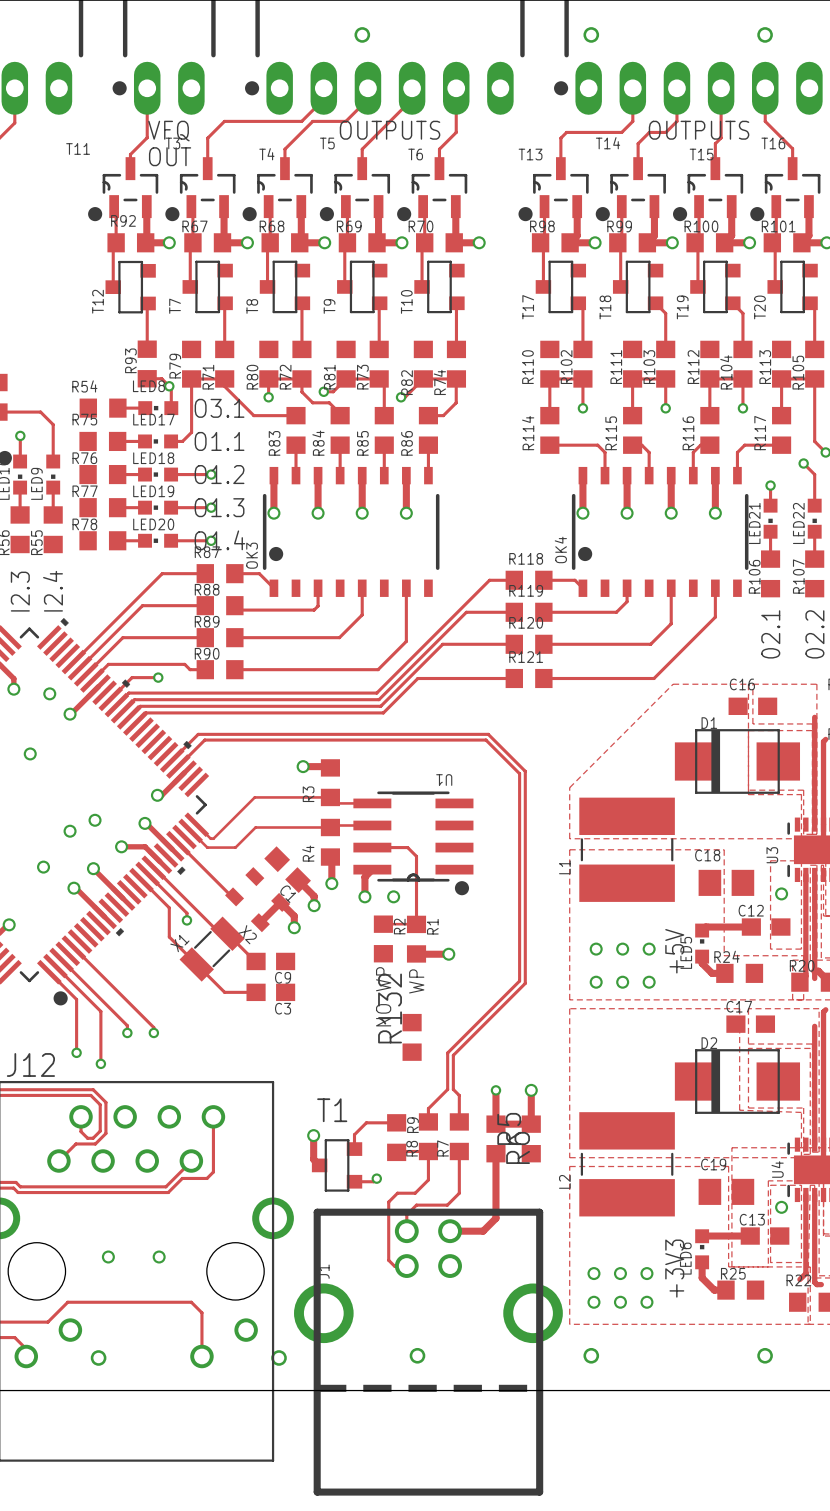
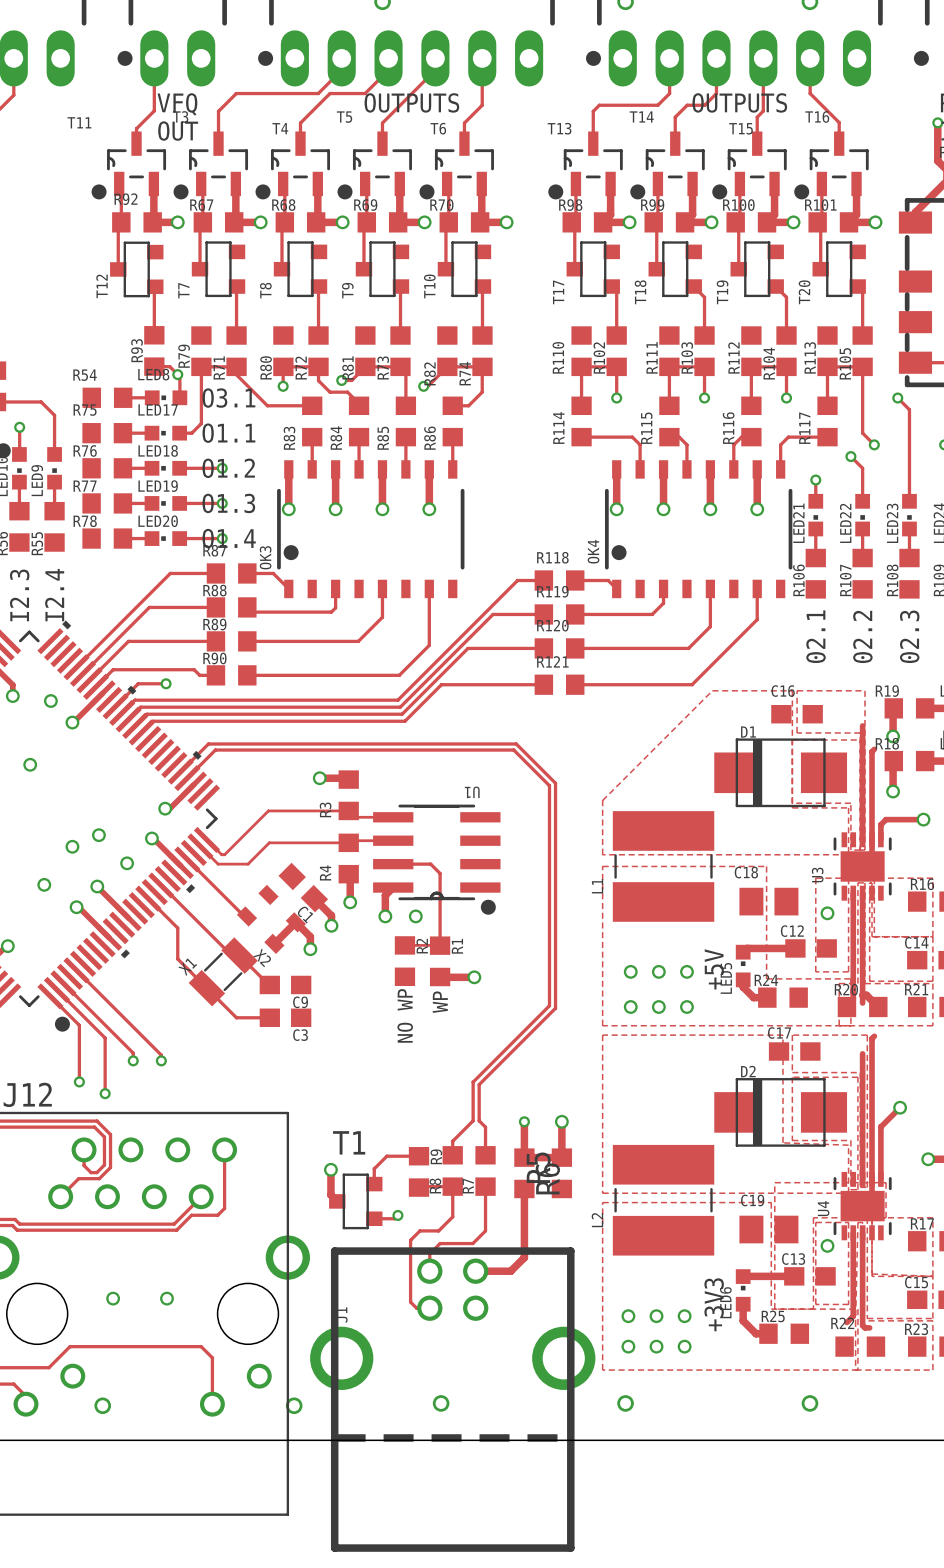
track: (121, 846) (145, 846) (159, 861) -> none
track: (147, 873) (186, 913) (186, 920) -> none
via: (186, 920) -> none
R132: (412, 1037) -> none

